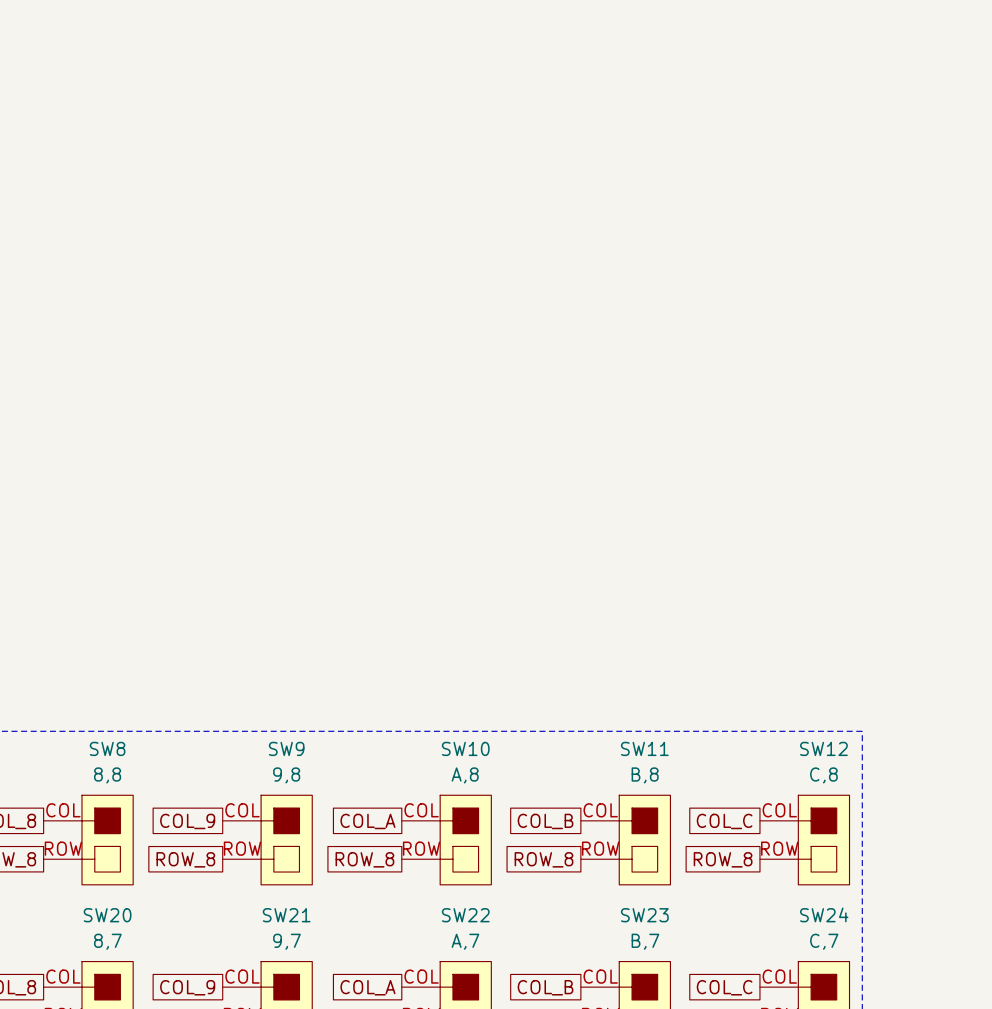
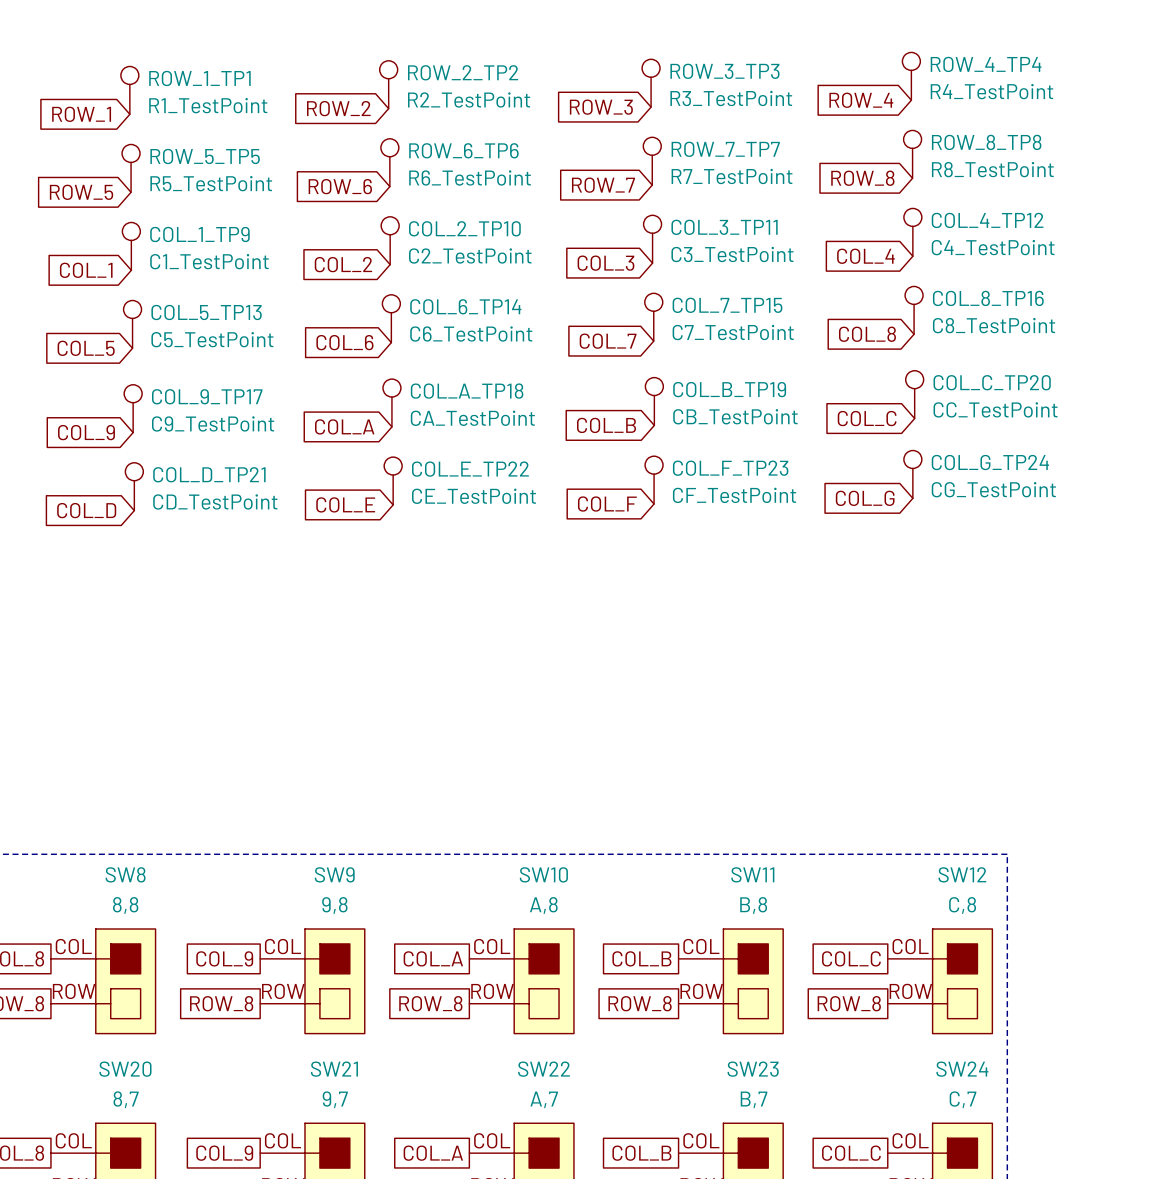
ROW_4_TP4: none -> R4_TestPoint (911, 76)
ROW_3_TP3: none -> R3_TestPoint (651, 83)
ROW_2_TP2: none -> R2_TestPoint (388, 84)
ROW_1_TP1: none -> R1_TestPoint (129, 90)
global label: none -> ROW_4 (861, 100)
global label: none -> ROW_3 (601, 107)
global label: none -> ROW_2 (338, 108)
global label: none -> ROW_1 (81, 114)
ROW_8_TP8: none -> R8_TestPoint (912, 154)
ROW_7_TP7: none -> R7_TestPoint (652, 161)
ROW_6_TP6: none -> R6_TestPoint (389, 162)
ROW_5_TP5: none -> R5_TestPoint (131, 168)
global label: none -> ROW_8 (862, 178)
global label: none -> ROW_7 (603, 185)
global label: none -> ROW_6 (340, 186)
global label: none -> ROW_5 (81, 192)
COL_4_TP12: none -> C4_TestPoint (912, 232)
COL_3_TP11: none -> C3_TestPoint (652, 239)
COL_2_TP10: none -> C2_TestPoint (390, 240)
COL_1_TP9: none -> C1_TestPoint (131, 246)
global label: none -> COL_4 (865, 256)
global label: none -> COL_3 (605, 263)
global label: none -> COL_2 (343, 264)
global label: none -> COL_1 (86, 270)
COL_8_TP16: none -> C8_TestPoint (914, 310)
COL_7_TP15: none -> C7_TestPoint (653, 317)
COL_6_TP14: none -> C6_TestPoint (391, 318)
COL_5_TP13: none -> C5_TestPoint (132, 324)
global label: none -> COL_8 (867, 334)
global label: none -> COL_7 (608, 341)
global label: none -> COL_6 (344, 342)
global label: none -> COL_5 (86, 348)
COL_C_TP20: none -> CC_TestPoint (914, 394)
COL_B_TP19: none -> CB_TestPoint (654, 401)
COL_A_TP18: none -> CA_TestPoint (391, 403)
COL_9_TP17: none -> C9_TestPoint (133, 408)
global label: none -> COL_C (867, 418)
global label: none -> COL_B (606, 425)
global label: none -> COL_A (344, 426)
global label: none -> COL_9 (86, 432)
COL_G_TP24: none -> CG_TestPoint (912, 474)
COL_F_TP23: none -> CF_TestPoint (654, 480)
COL_E_TP22: none -> CE_TestPoint (393, 481)
COL_D_TP21: none -> CD_TestPoint (134, 486)
global label: none -> COL_G (865, 498)
global label: none -> COL_E (345, 504)
global label: none -> COL_F (607, 504)
global label: none -> COL_D (86, 510)

